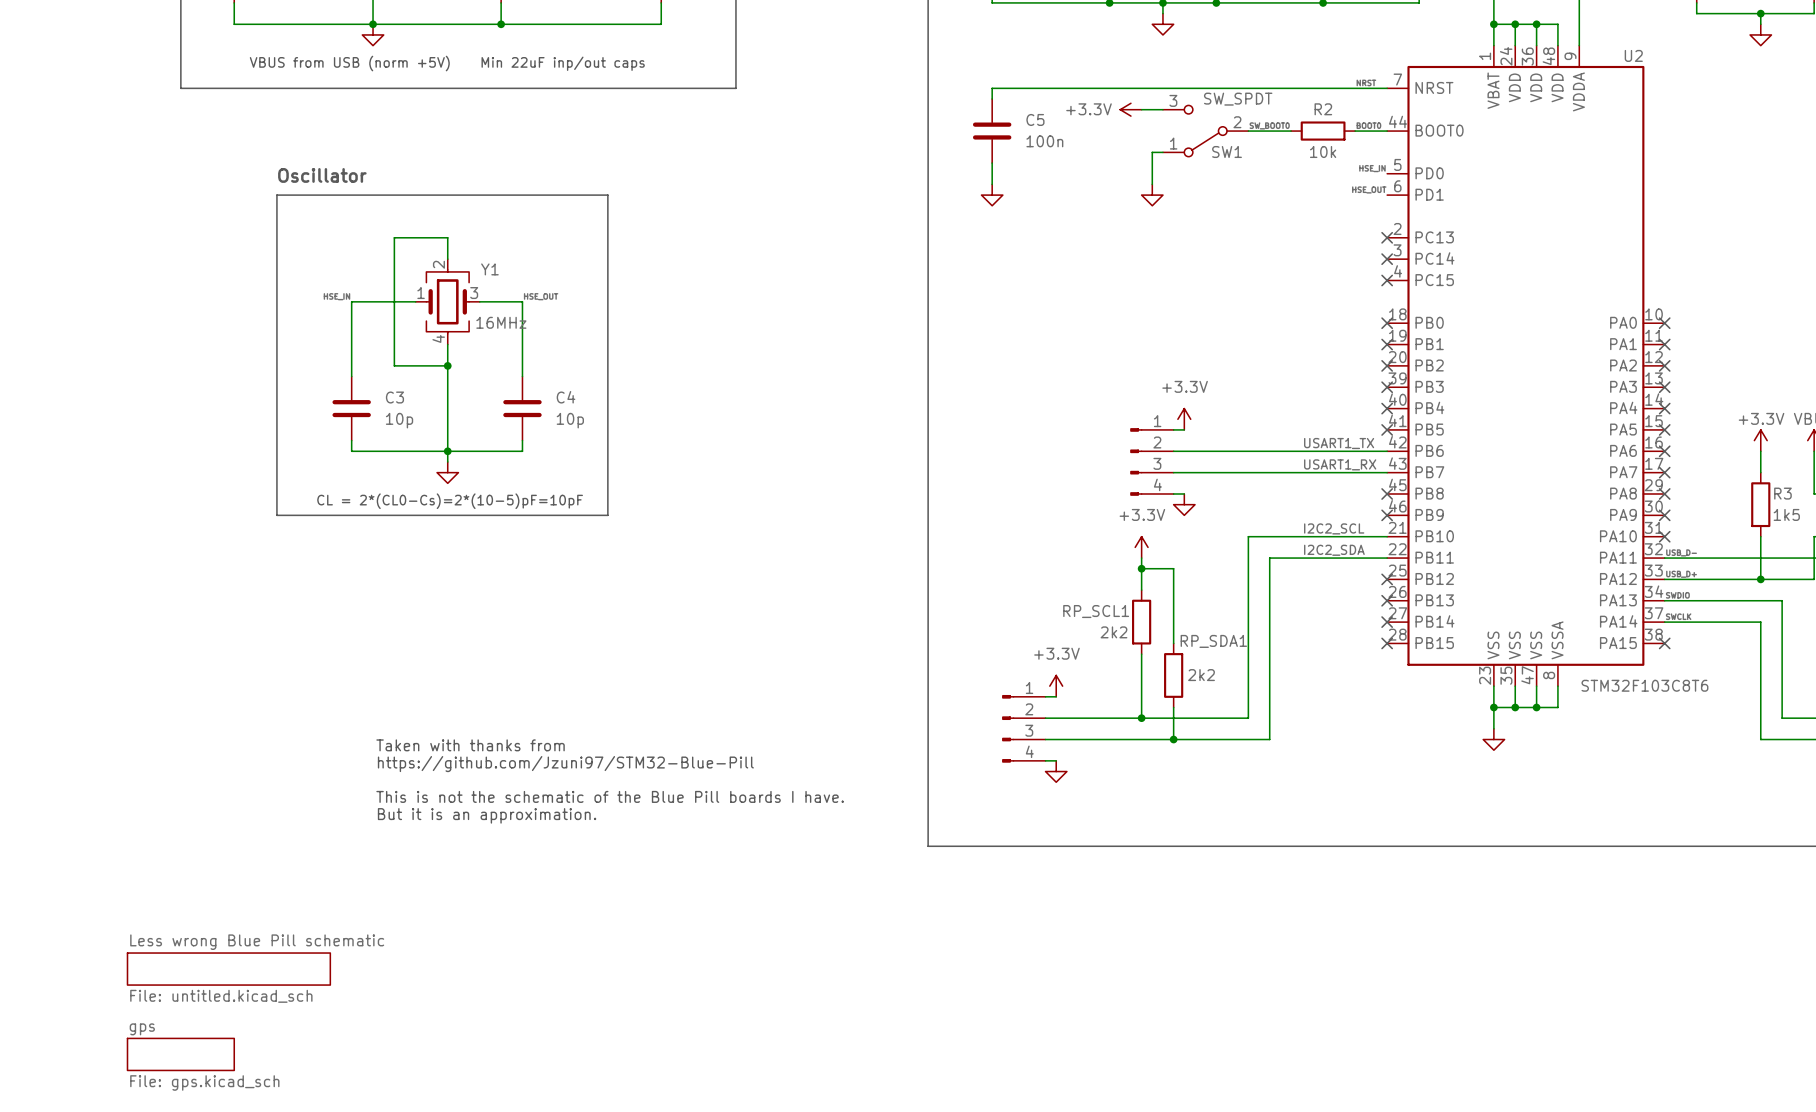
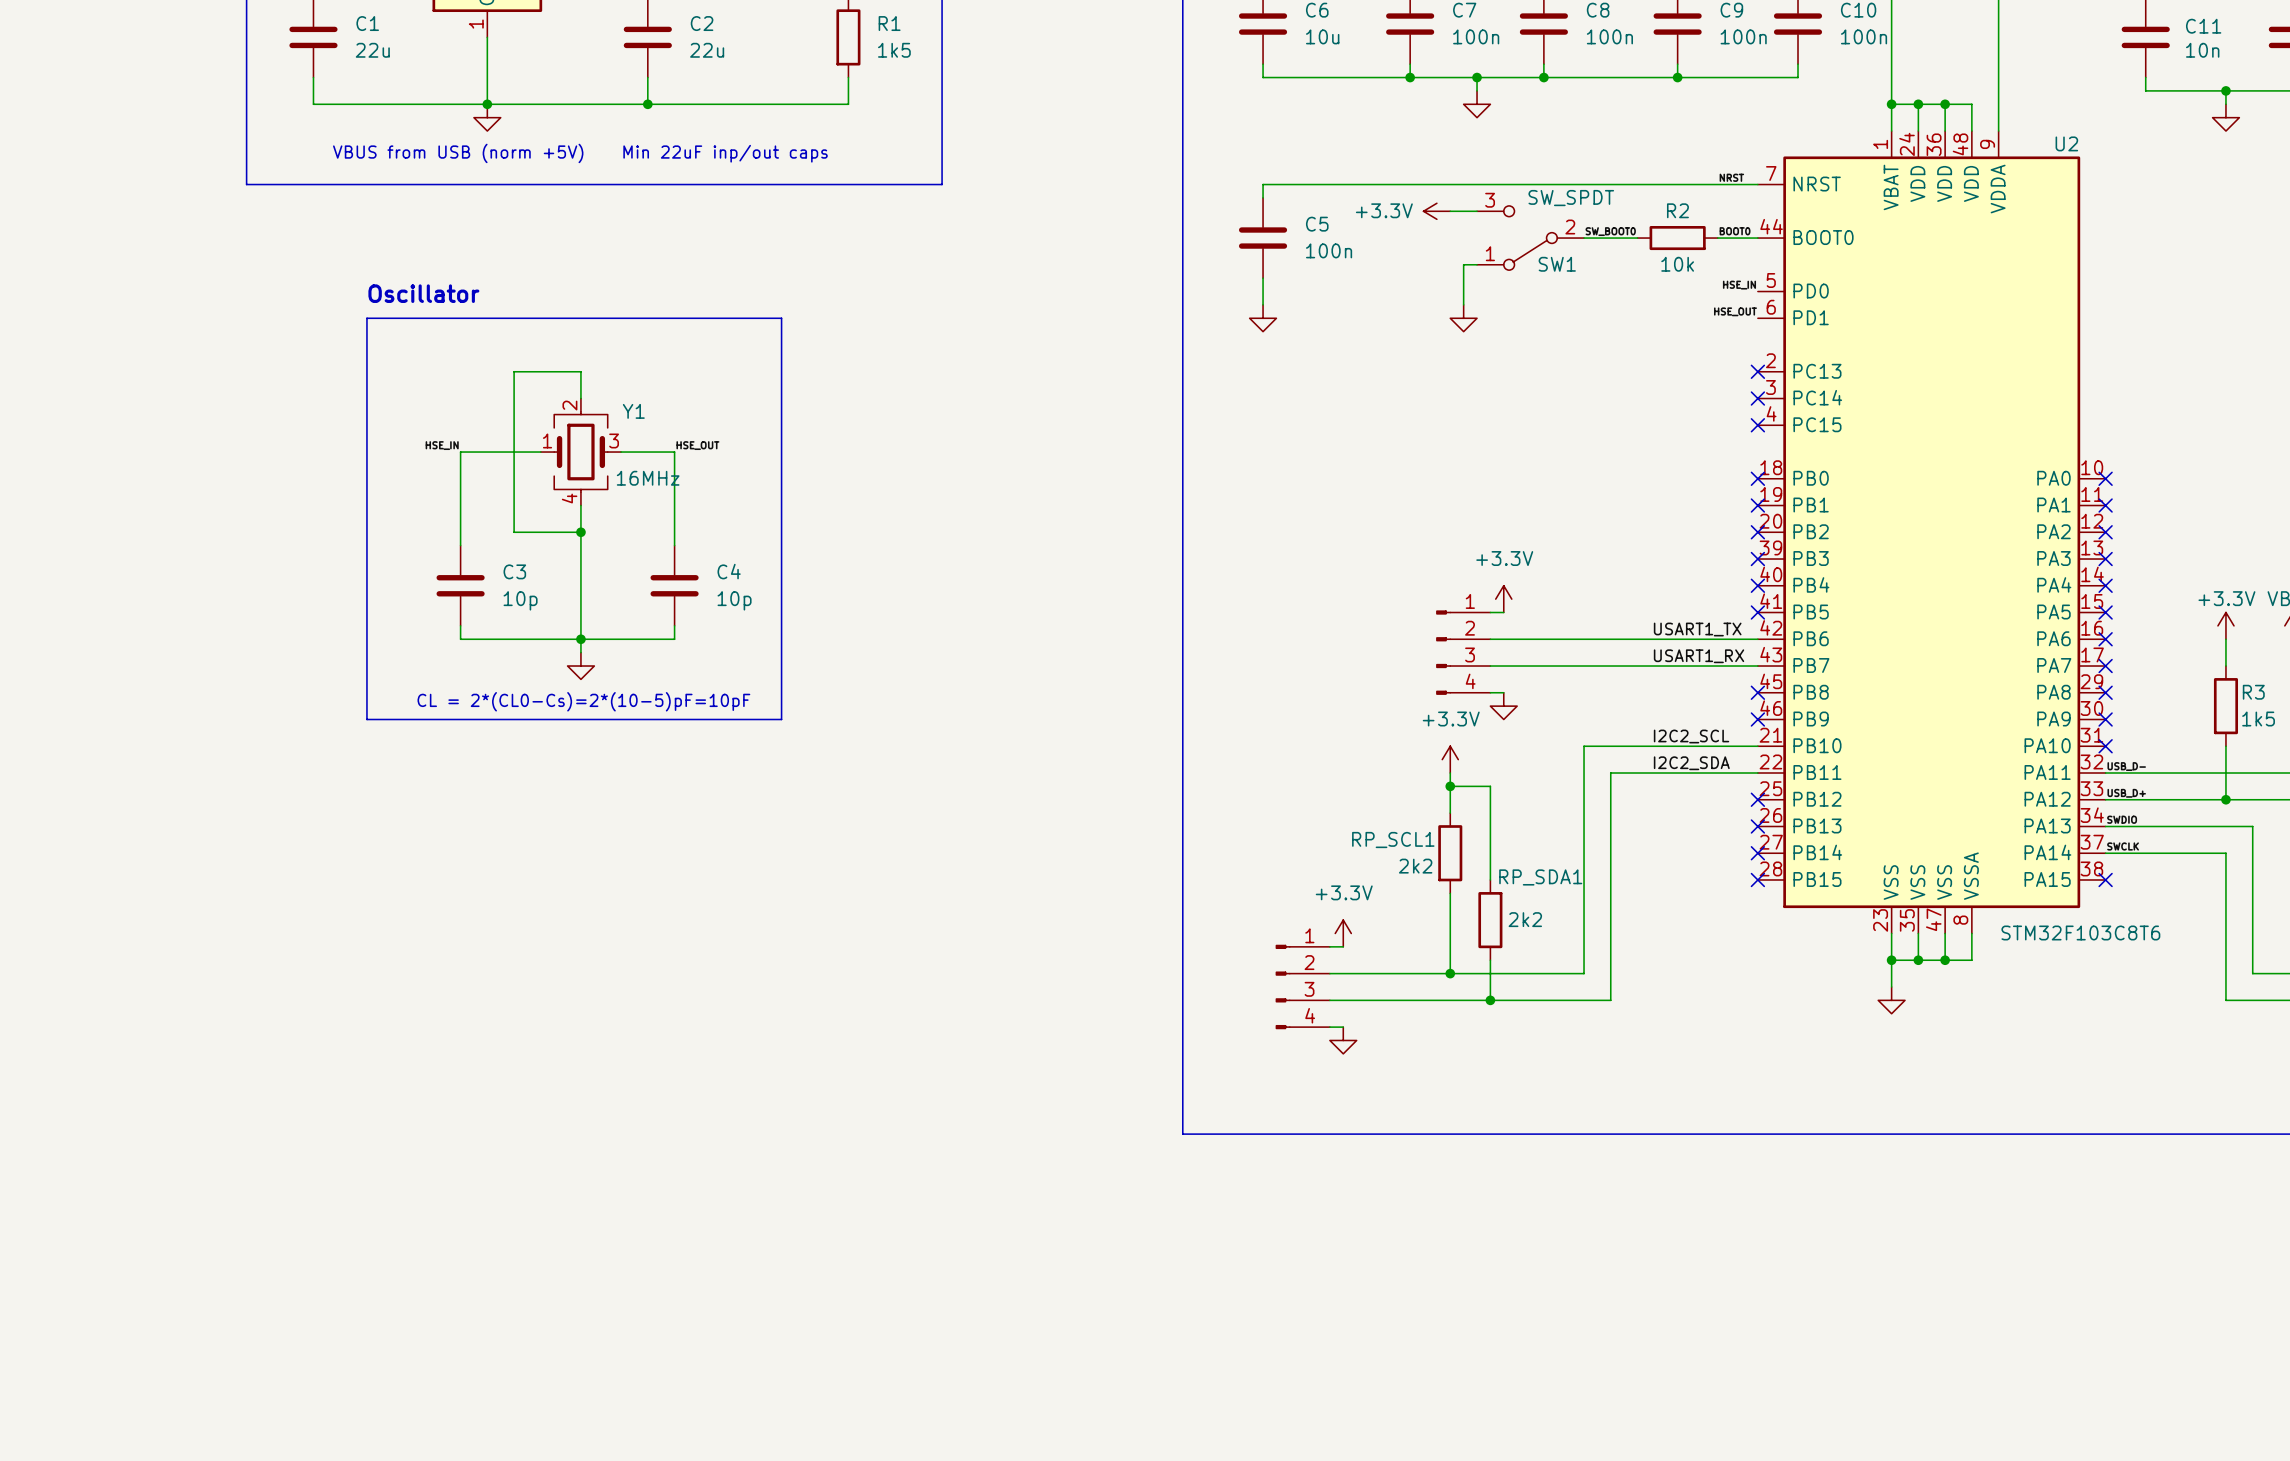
text: Taken with thanks from (470, 745) -> none
text: https://github.com/Jzuni97/STM32-Blue-Pill (565, 764) -> none
text: This is not the schematic of the Blue Pill boards I have. (610, 796) -> none
text: But it is an approximation. (487, 815) -> none
sheet Less wrong Blue Pill schematic: File: untitled.kicad_sch (228, 969) -> none
sheet gps: File: gps.kicad_sch (180, 1054) -> none

